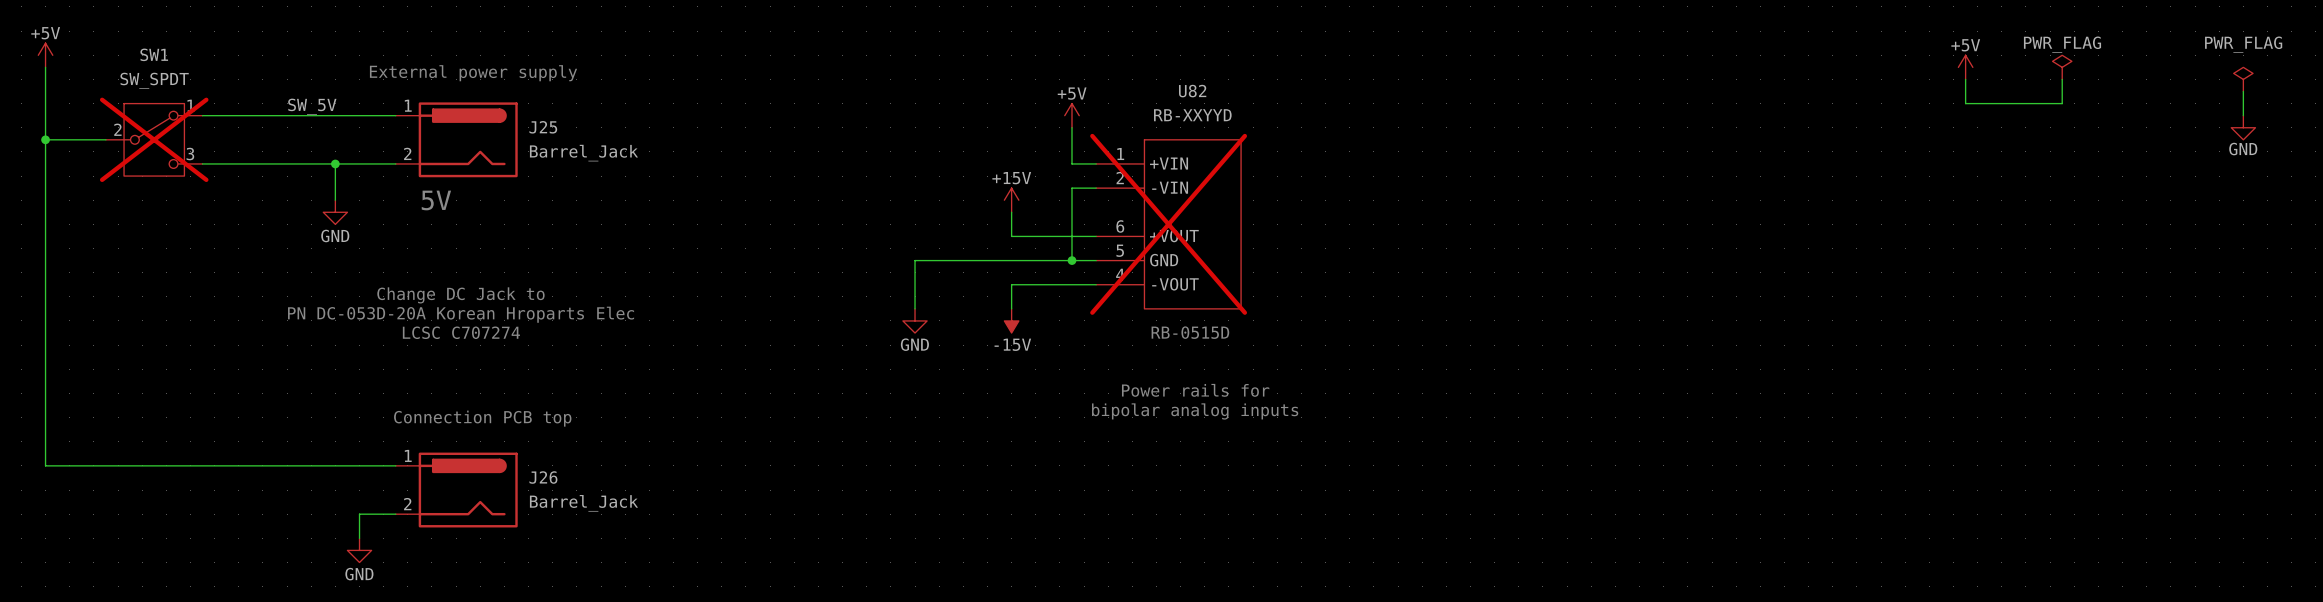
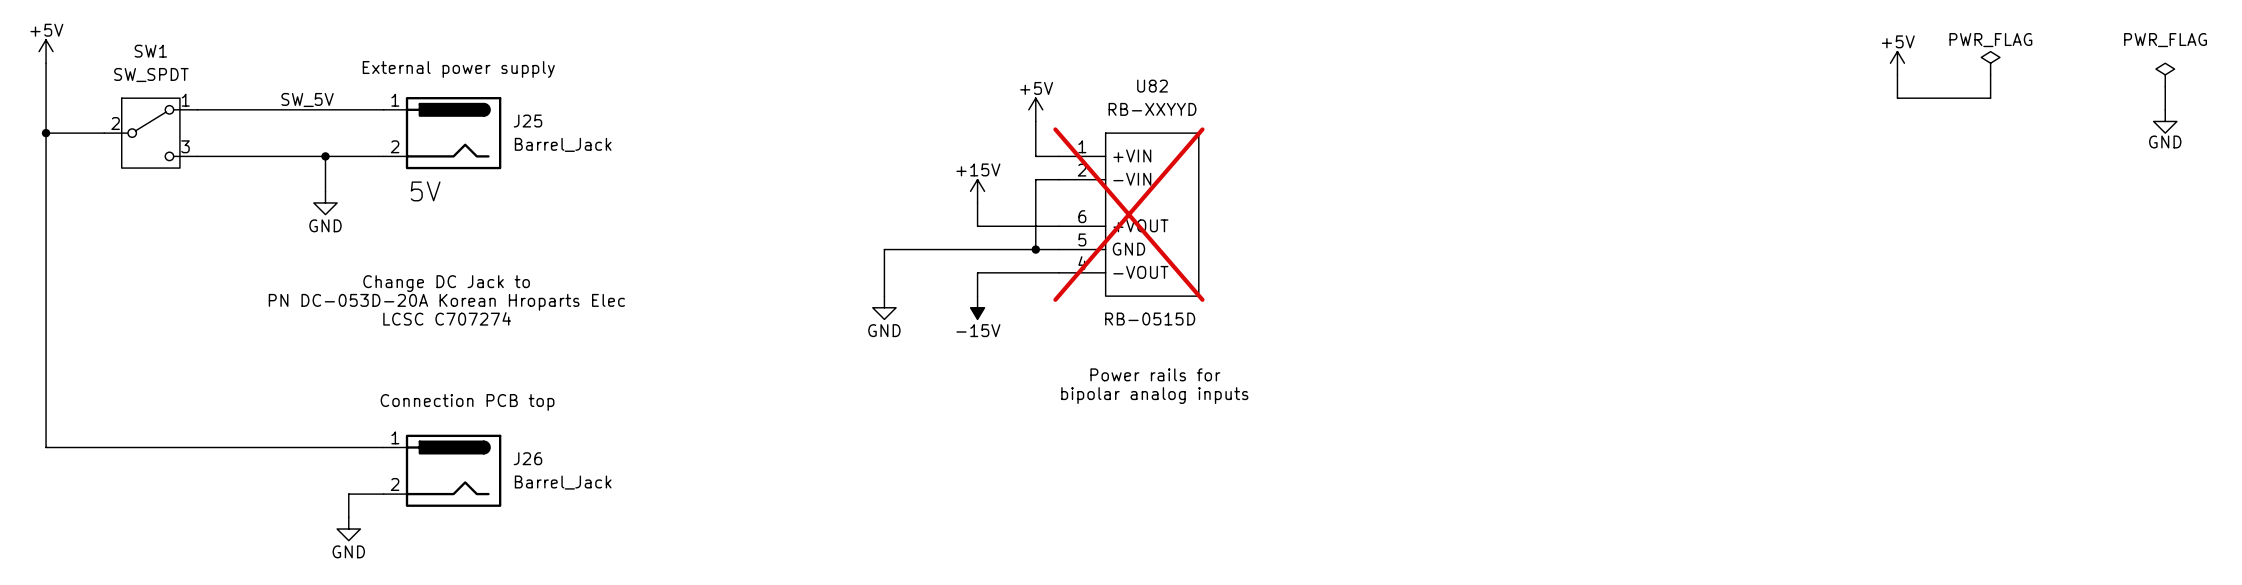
SW1 do-not-place cross: (154, 139) -> none

